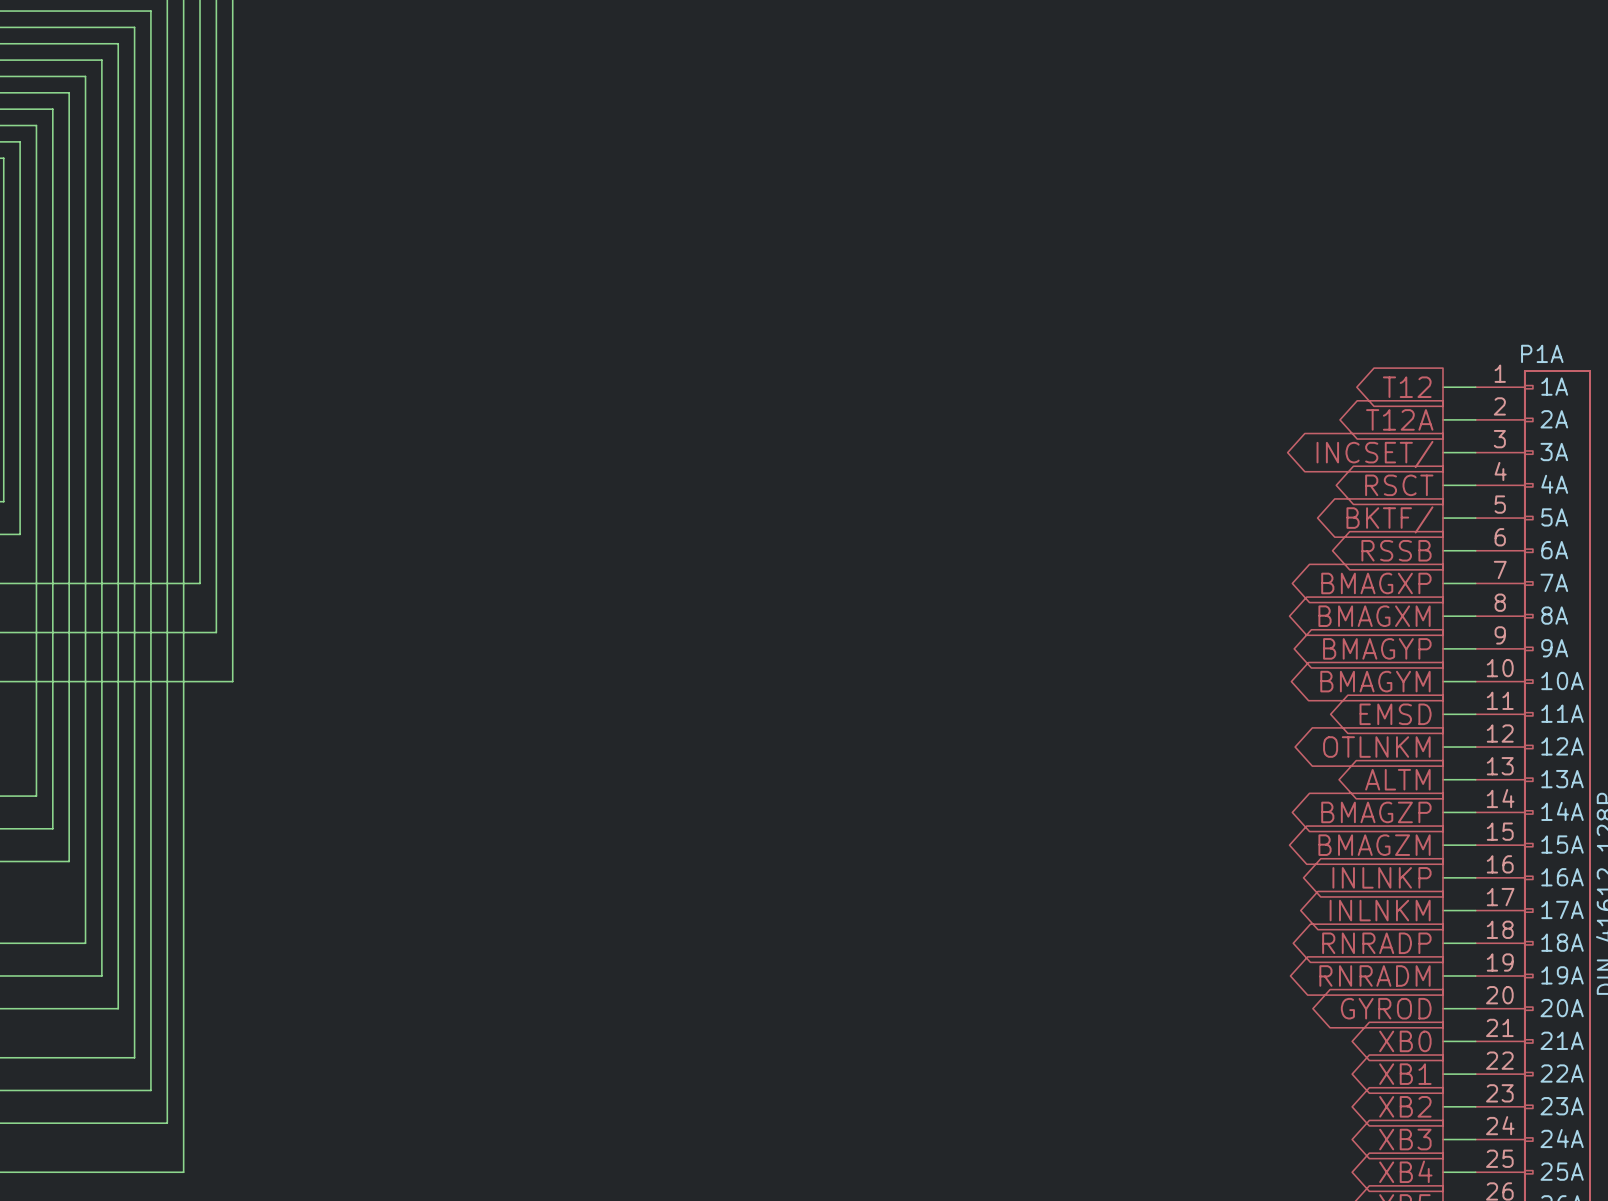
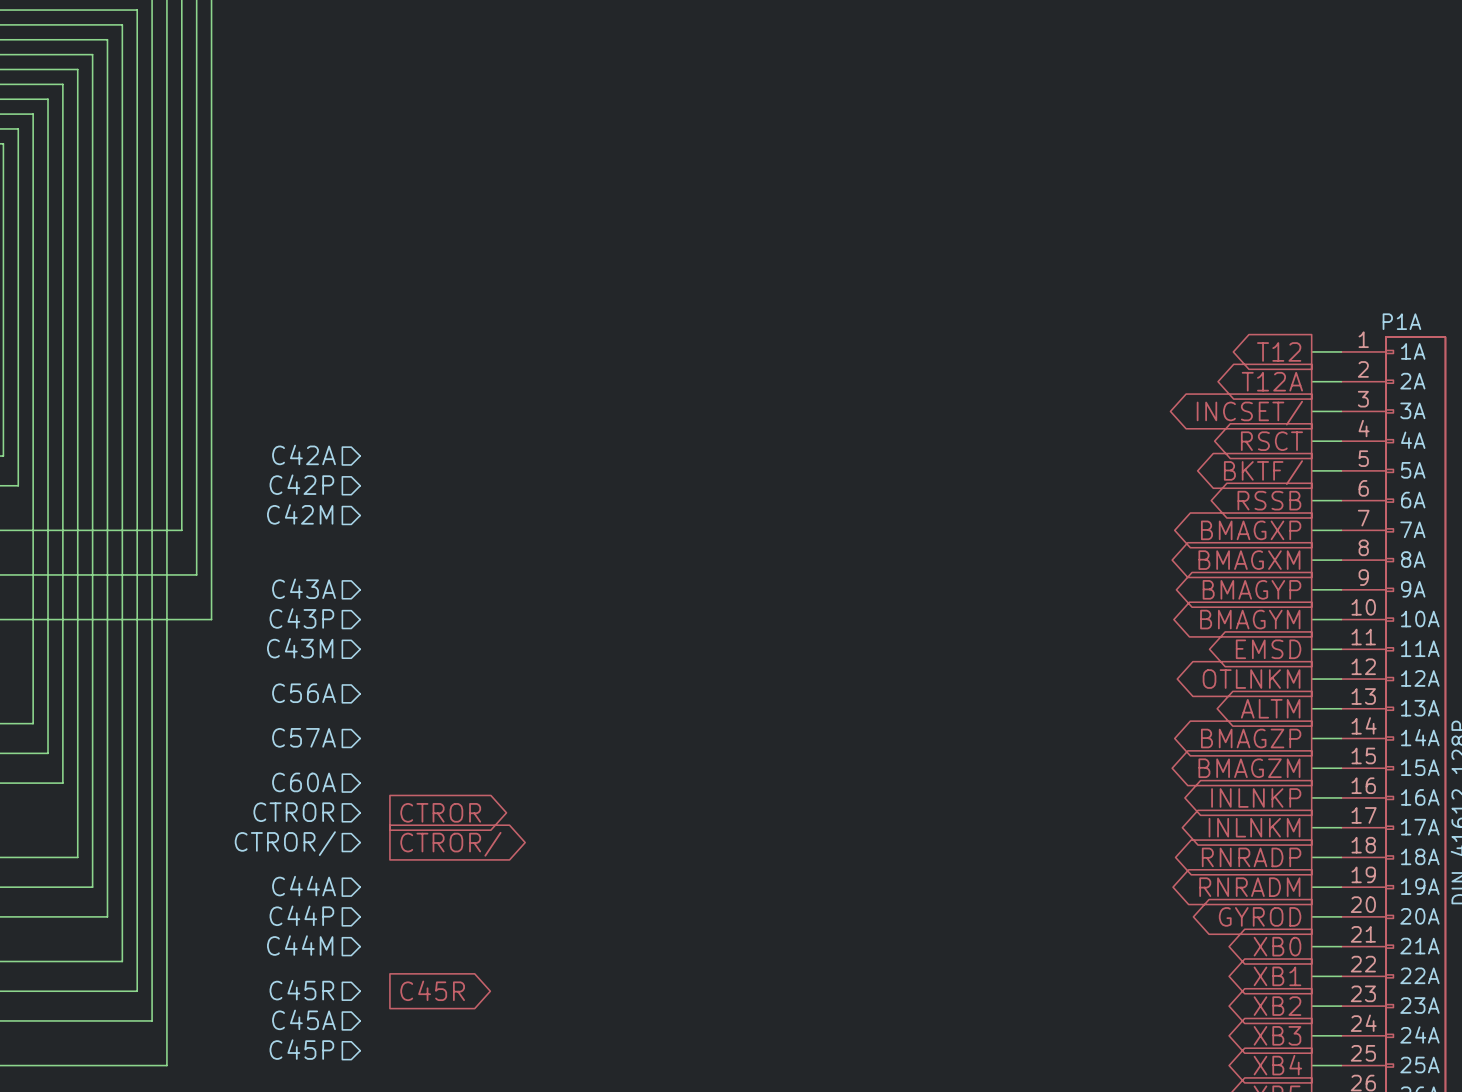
sheet pin: none -> C42A (304, 454)
sheet pin: none -> C42P (301, 484)
sheet pin: none -> C42M (300, 514)
sheet pin: none -> C43A (304, 588)
sheet pin: none -> C43P (301, 618)
sheet pin: none -> C43M (300, 648)
sheet pin: none -> C56A (304, 693)
sheet pin: none -> C57A (304, 737)
sheet pin: none -> C60A (304, 782)
sheet pin: none -> CTROR (293, 812)
global label: none -> CTROR (440, 812)
sheet pin: none -> CTROR/ (285, 843)
global label: none -> CTROR/ (450, 844)
sheet pin: none -> C44A (304, 886)
sheet pin: none -> C44P (301, 915)
sheet pin: none -> C44M (300, 945)
sheet pin: none -> C45R (301, 990)
global label: none -> C45R (432, 990)
sheet pin: none -> C45A (304, 1019)
sheet pin: none -> C45P (301, 1049)

